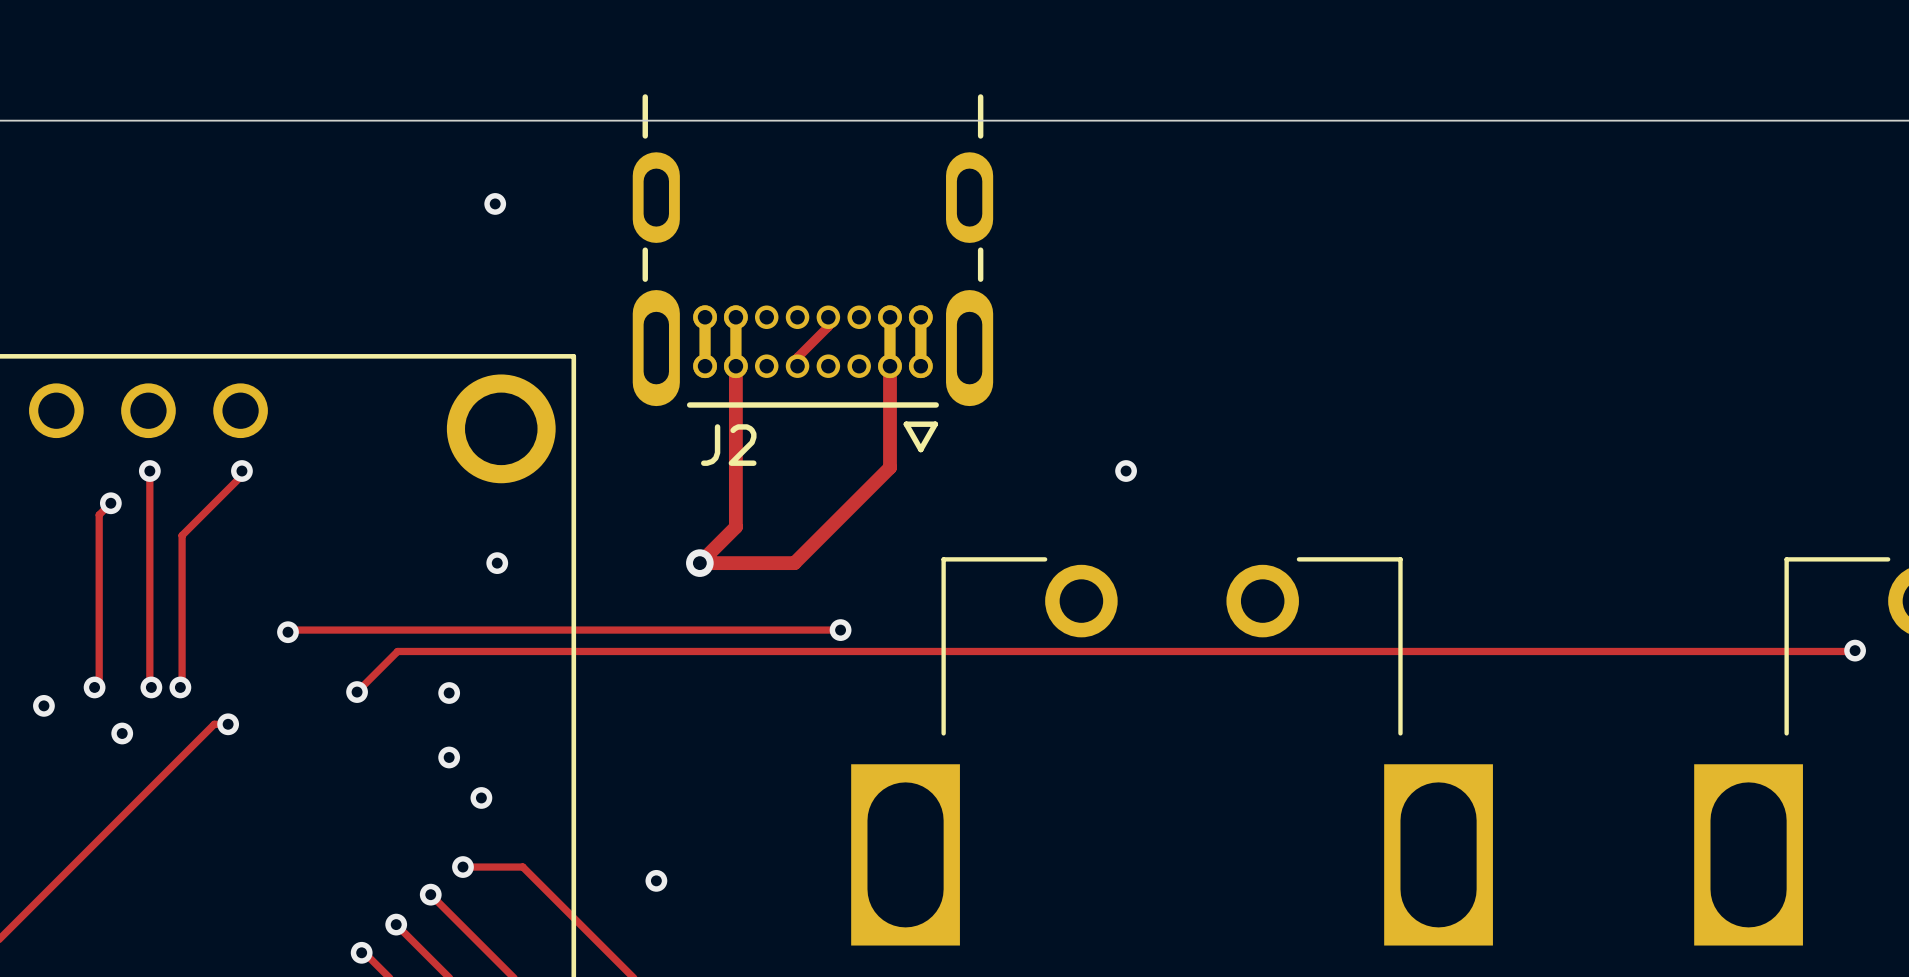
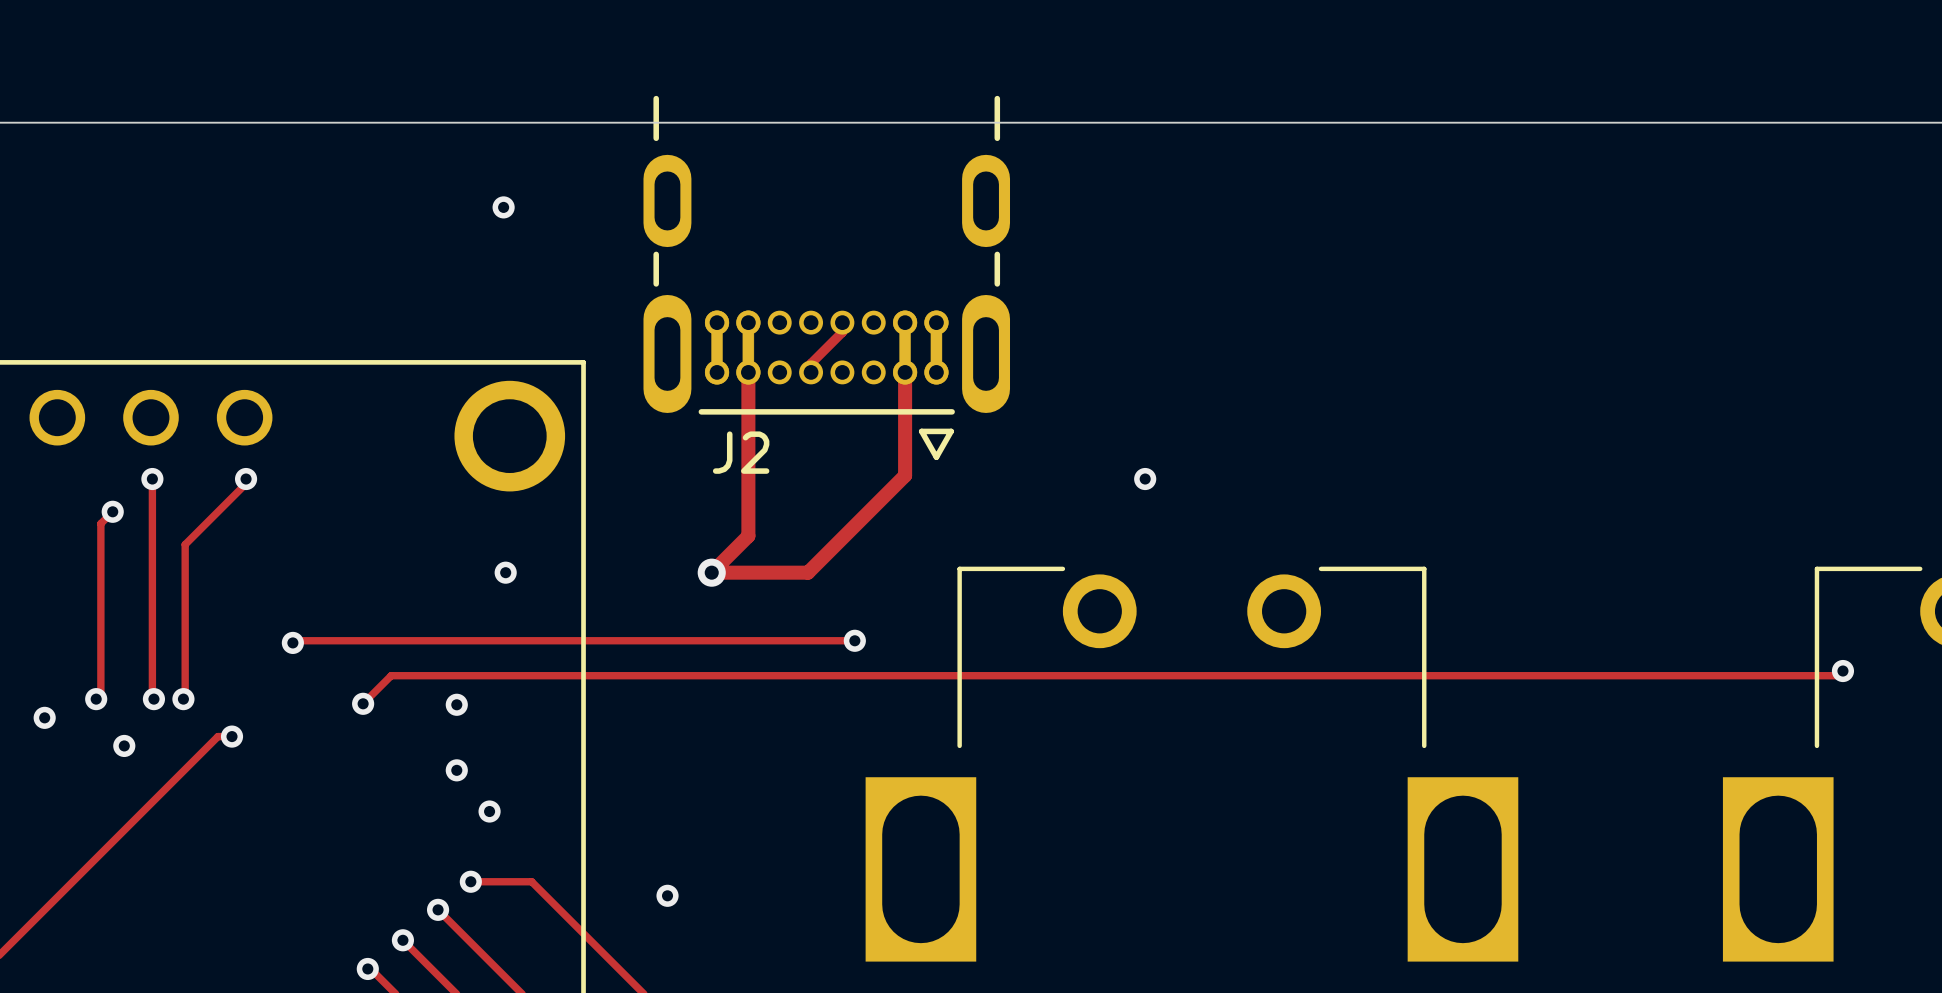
track: (1855, 650) (397, 651) (384, 664) -> (1842, 671) (1838, 675) (391, 675)
via position: (1855, 650) -> (1842, 671)

